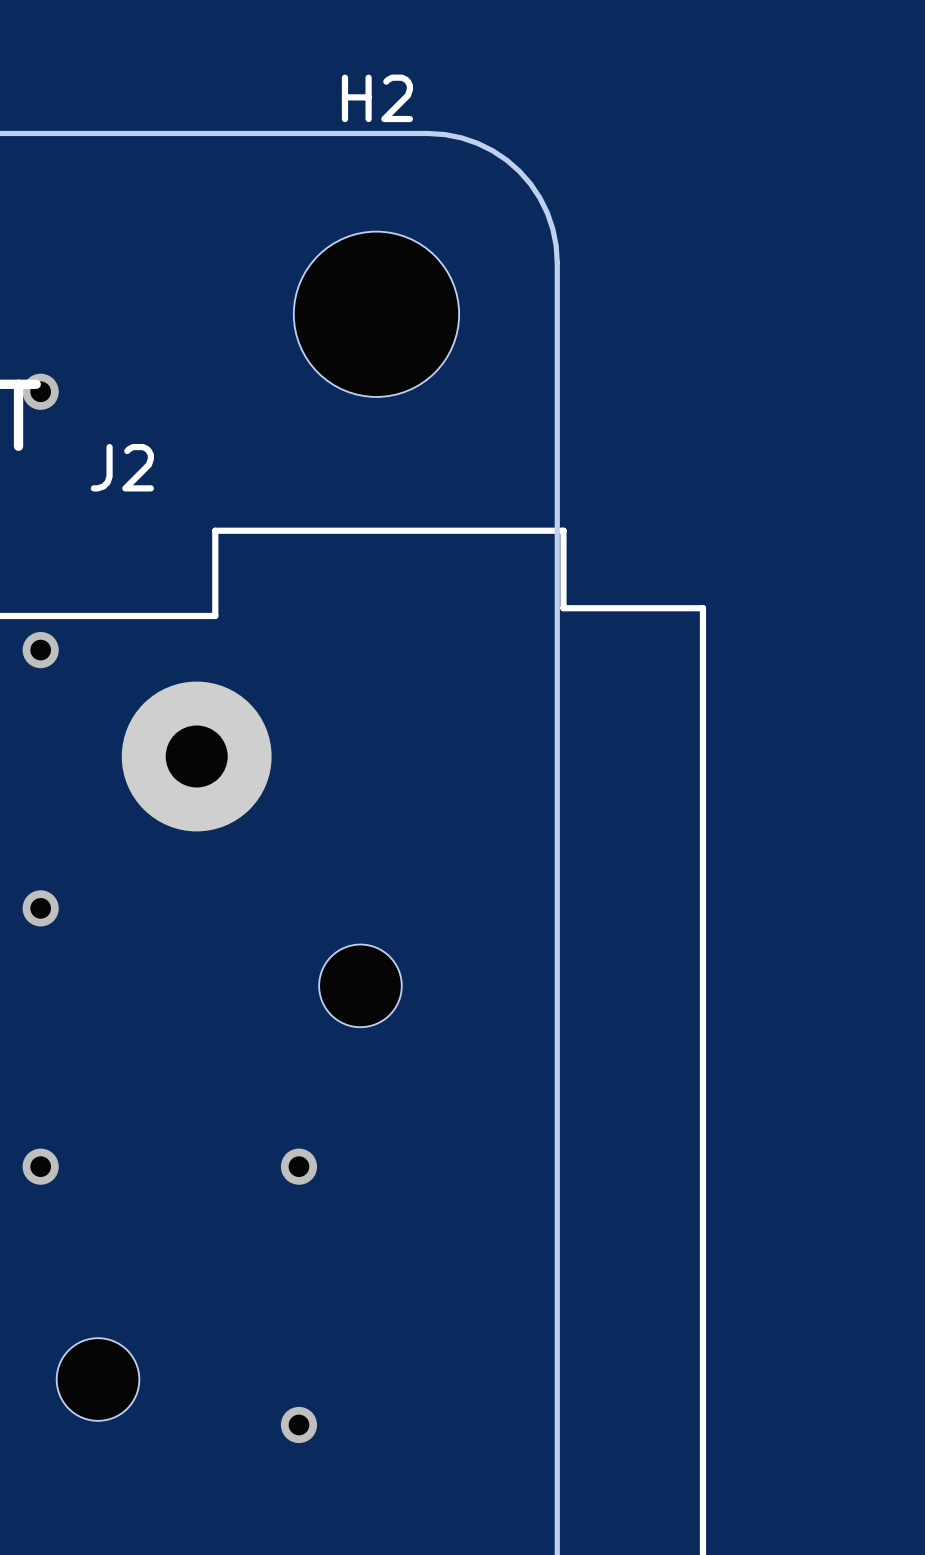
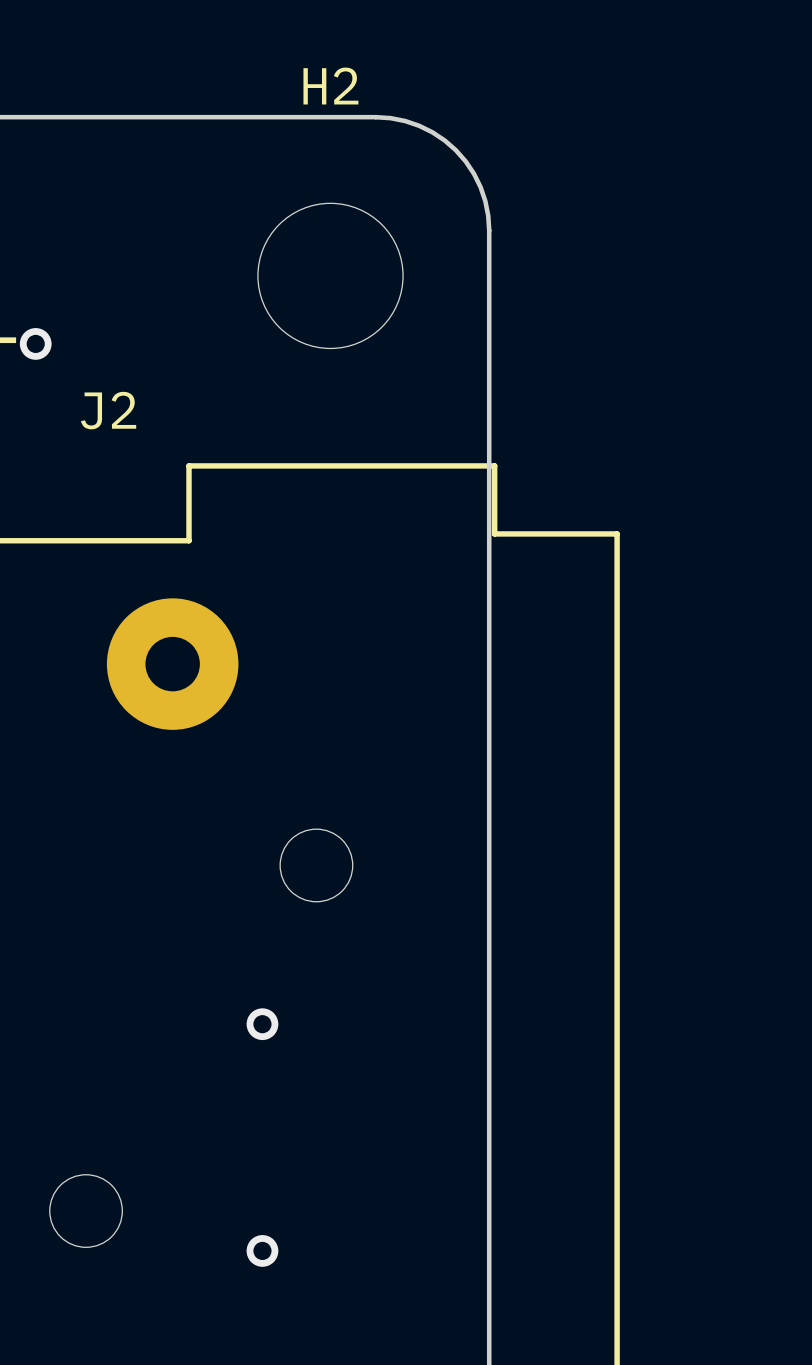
via: (40, 650) -> none
via: (40, 908) -> none
via: (40, 1166) -> none

